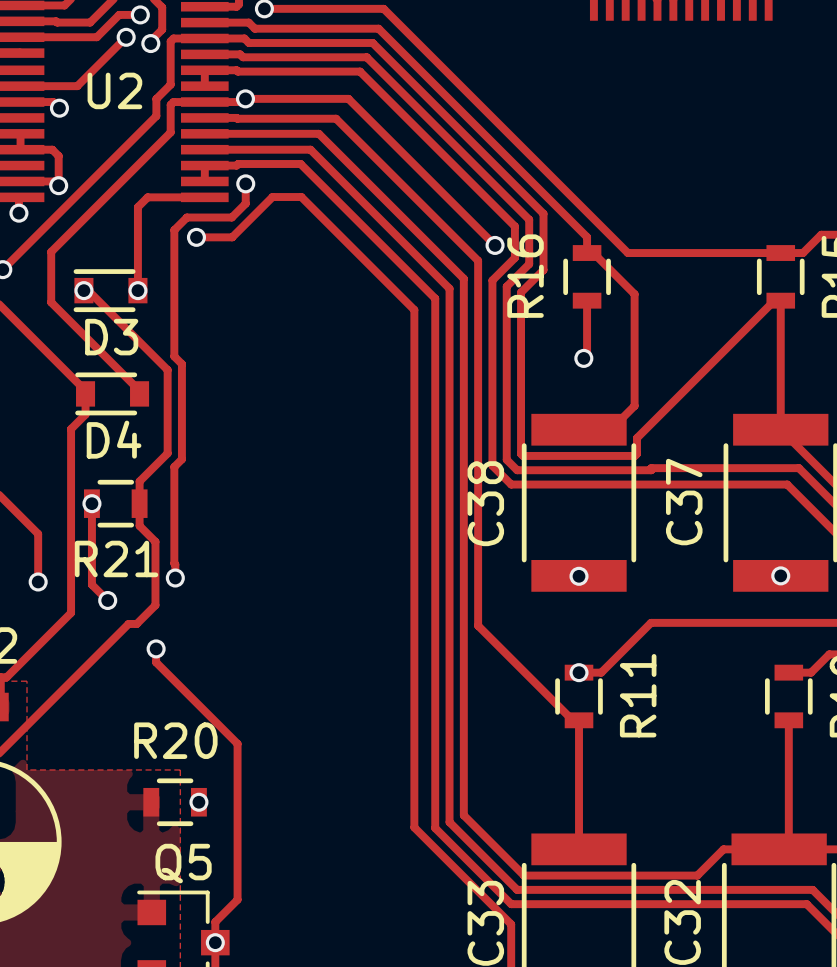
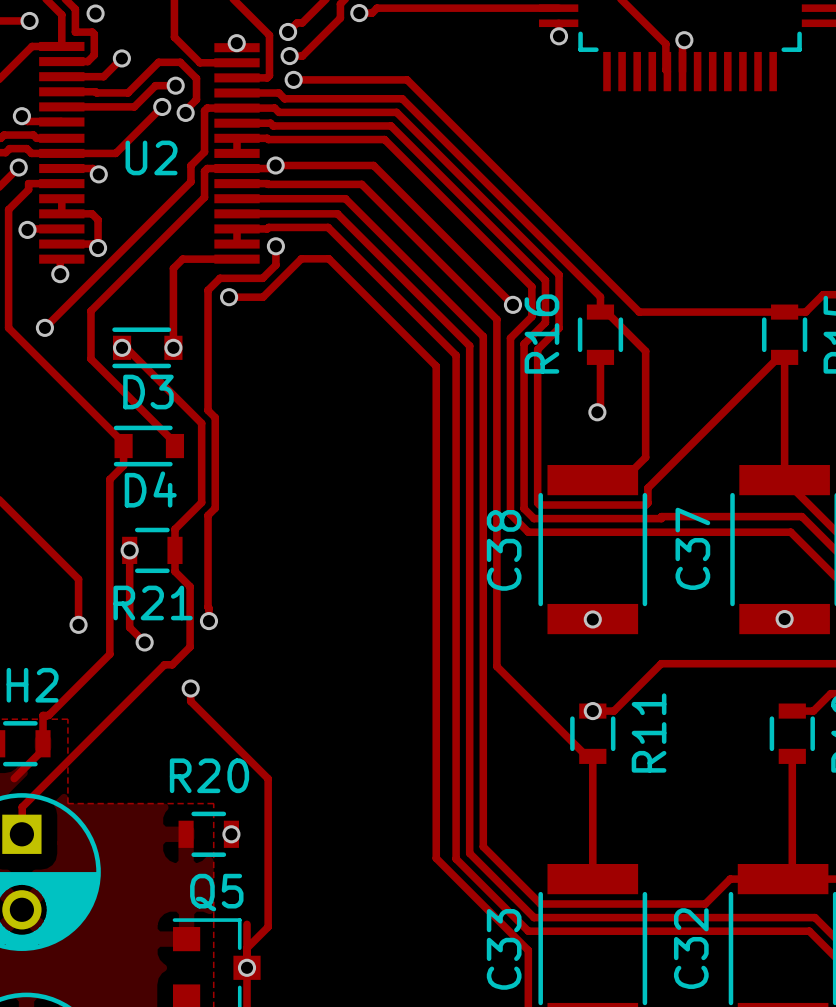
track: none -> (247, 924) (247, 948)

